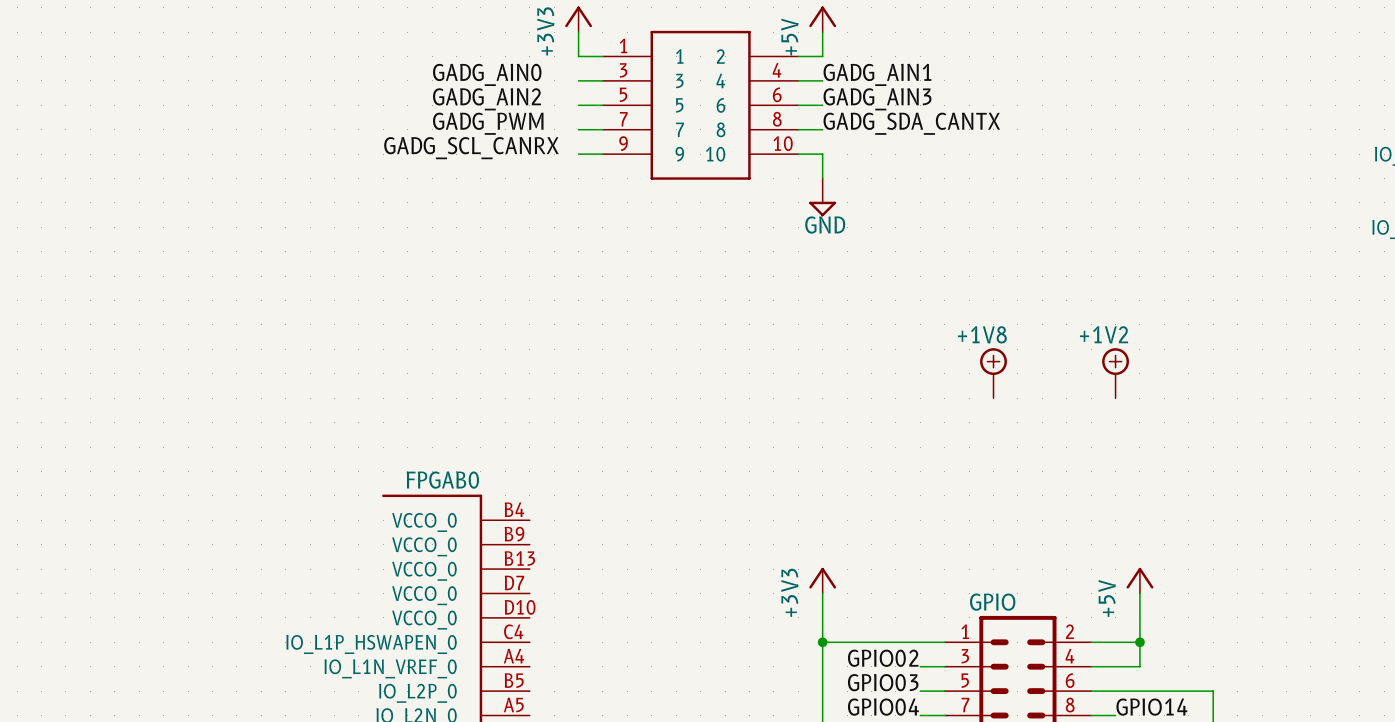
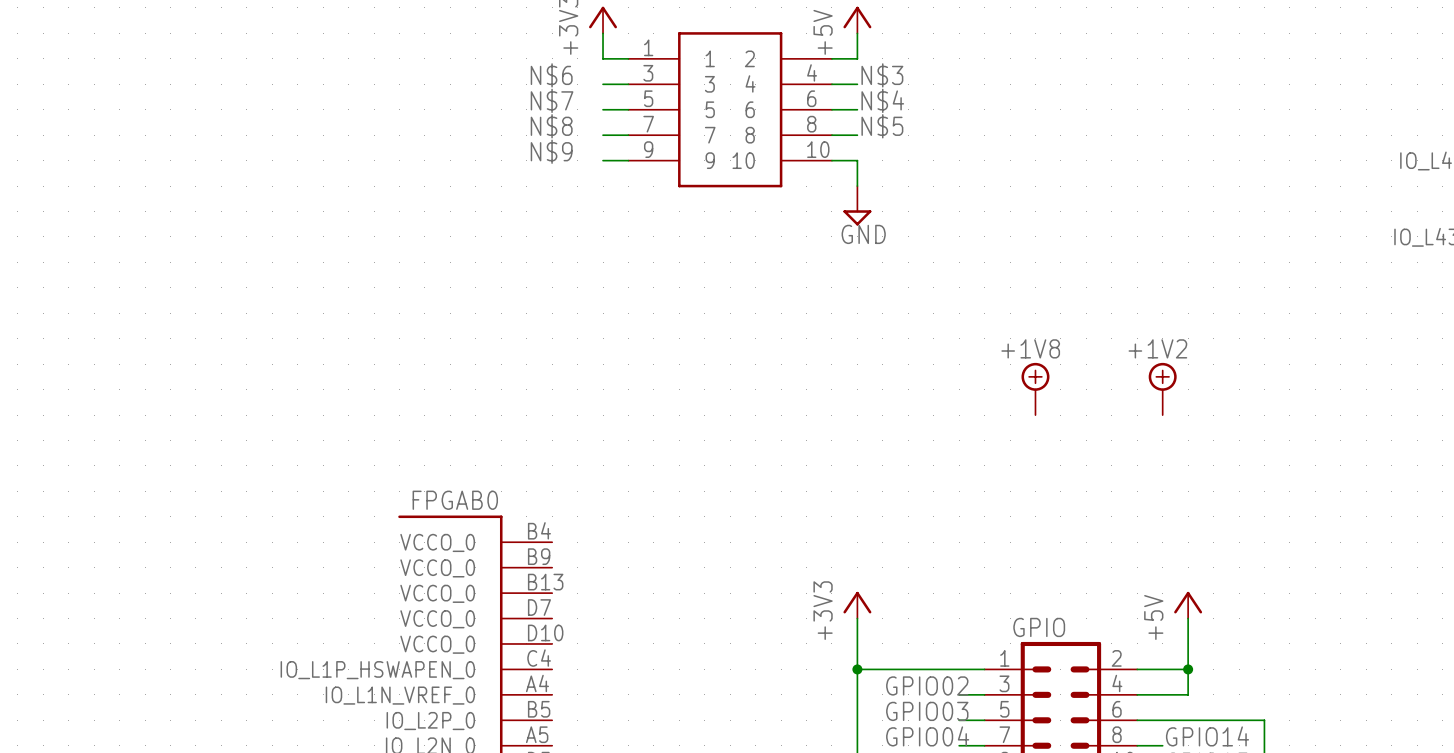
label: none -> N$6 (551, 75)
label: GADG_AIN0 (487, 74) -> none
label: GADG_AIN1 (877, 74) -> N$3 (882, 75)
label: none -> N$7 (552, 100)
label: GADG_AIN2 (486, 99) -> none
label: GADG_AIN3 (877, 99) -> N$4 (882, 100)
label: none -> N$8 (551, 126)
label: GADG_PWM (488, 123) -> none
label: GADG_SDA_CANTX (911, 123) -> N$5 (882, 126)
label: none -> N$9 (551, 151)
label: GADG_SCL_CANRX (471, 148) -> none

